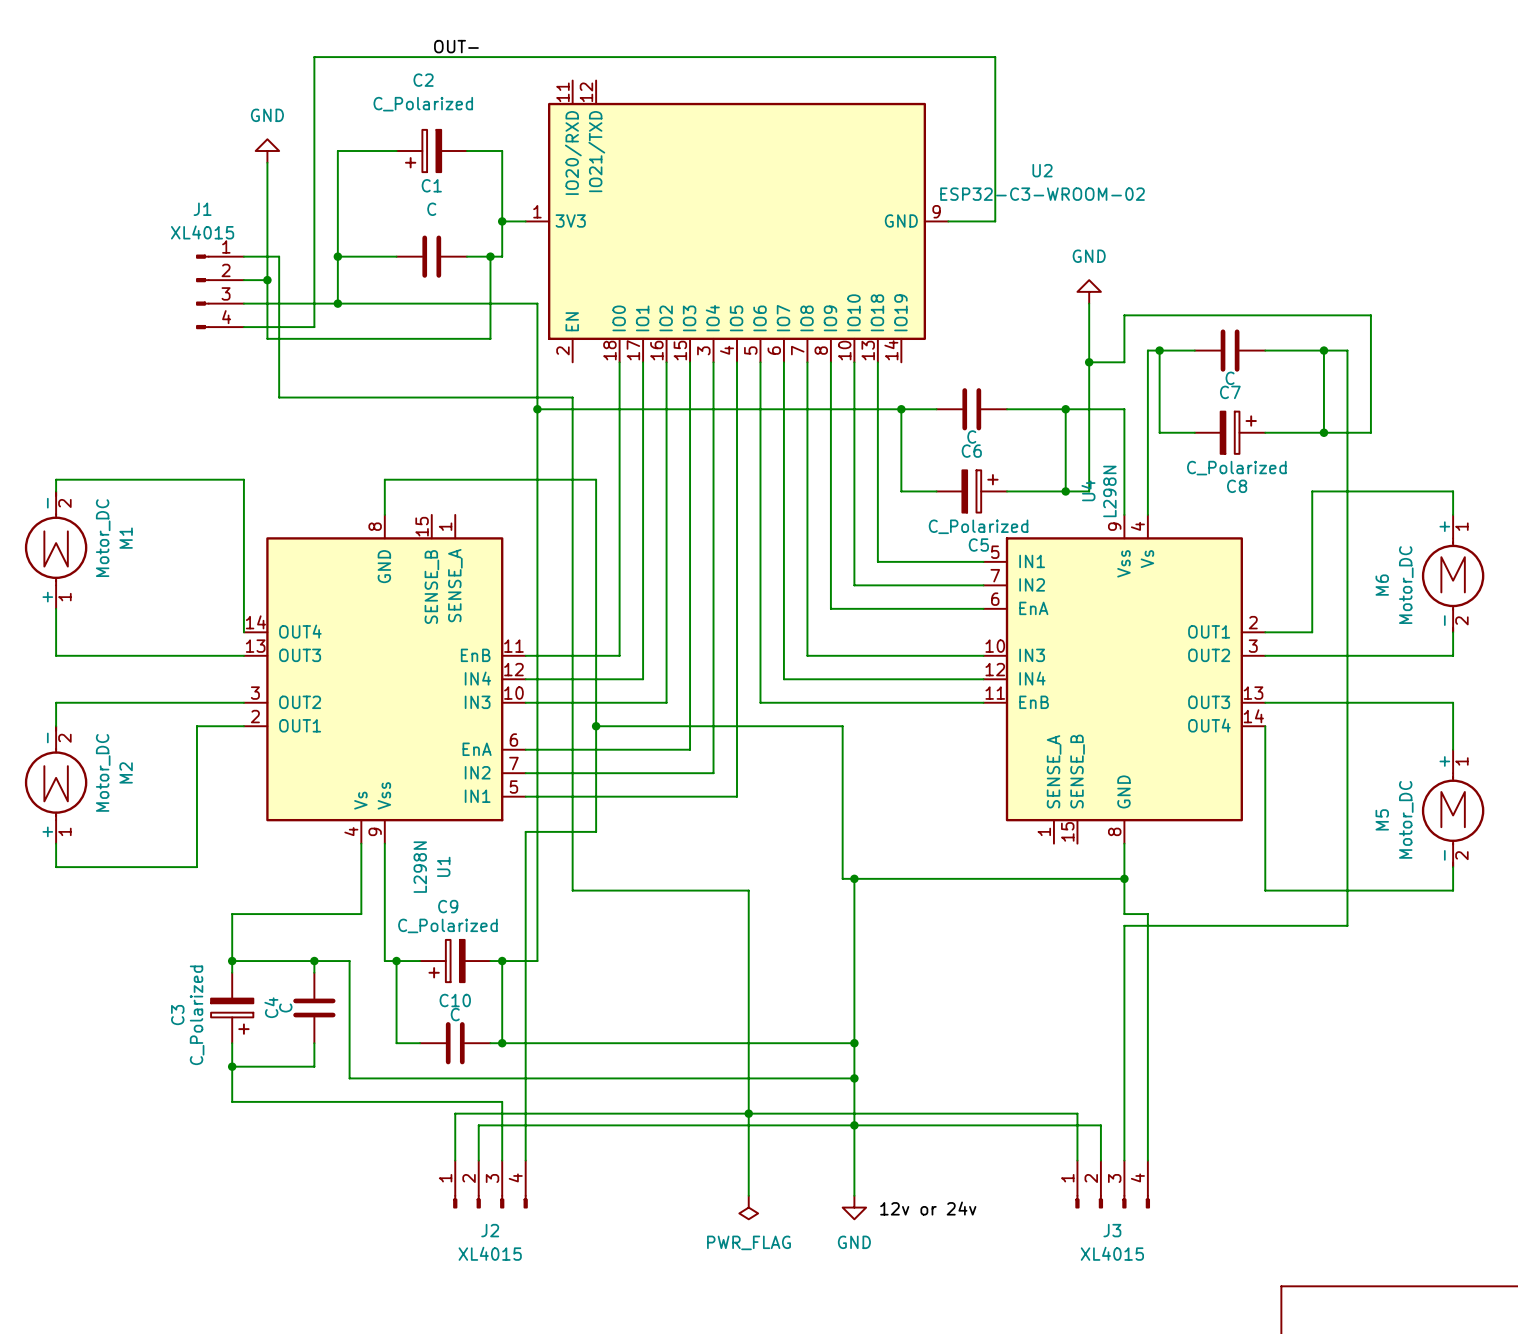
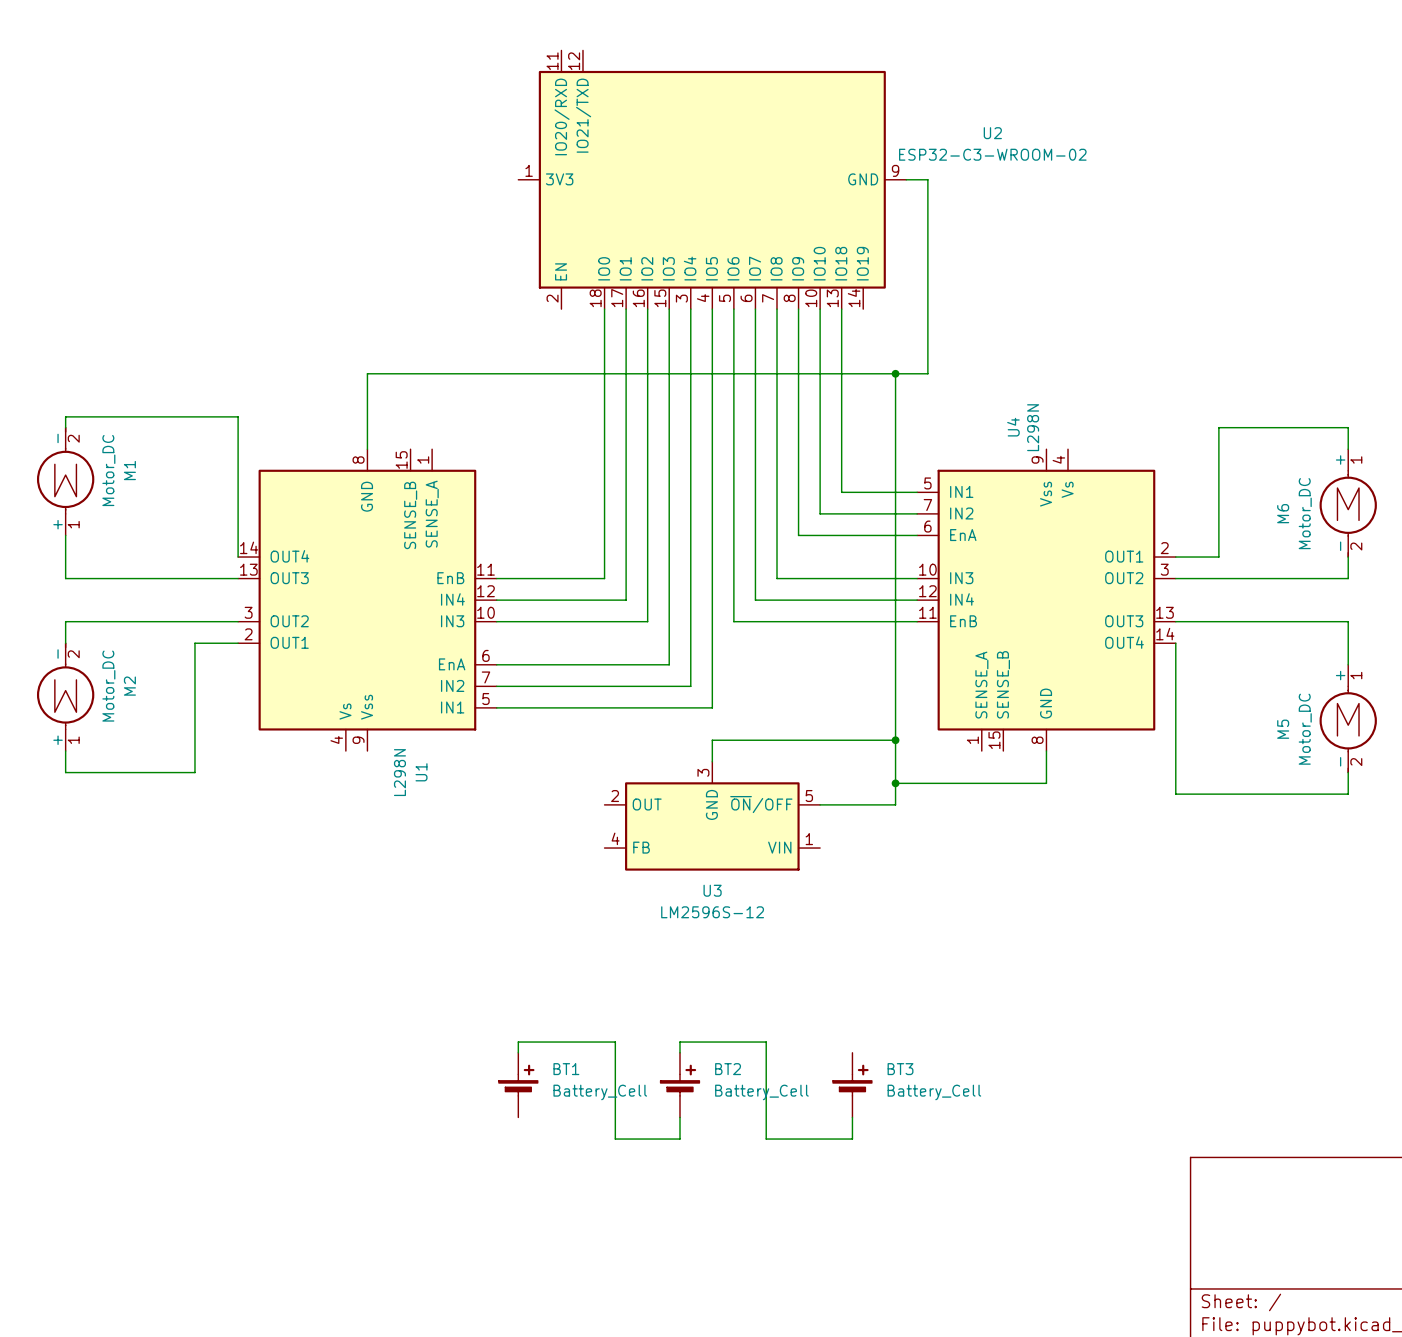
label: OUT- (456, 46) -> none
power symbol: GND (267, 151) -> none
wire: (396, 151) (337, 151) (337, 303) -> none
C2: C_Polarized (431, 151) -> none
wire: (466, 151) (502, 151) (502, 256) (466, 256) -> none
wire: (267, 162) (267, 338) (490, 338) (490, 256) -> none
wire: (502, 221) (525, 221) -> none
junction: (502, 221) -> none
U2 position: (737, 221) -> (712, 179)
wire: (995, 221) (995, 57) (314, 57) (314, 327) (243, 327) -> (927, 179) (927, 373) (367, 373) (367, 416)
wire: (243, 256) (279, 256) (279, 397) (572, 397) (572, 890) (748, 890) (748, 1195) -> none
wire: (337, 256) (396, 256) -> none
junction: (337, 256) -> none
C1: C (431, 256) -> none
junction: (490, 256) -> none
wire: (243, 280) (267, 280) -> none
junction: (267, 280) -> none
J1: XL4015 (220, 291) -> none
power symbol: GND (1089, 291) -> none
wire: (243, 303) (537, 303) (537, 961) (490, 961) -> none
junction: (337, 303) -> none
wire: (1089, 303) (1089, 491) (1007, 491) -> none
wire: (1159, 350) (1159, 432) (1194, 432) -> none
junction: (1159, 350) -> none
wire: (1194, 350) (1147, 350) (1147, 514) -> none
C7: C (1230, 350) -> none
wire: (1265, 350) (1347, 350) (1347, 925) (1124, 925) (1124, 1160) -> none
wire: (1323, 350) (1323, 432) -> none
junction: (1323, 350) -> none
wire: (619, 362) (619, 655) -> (604, 578) (582, 578)
wire: none -> (841, 309) (841, 352)
wire: (1089, 362) (1124, 362) (1124, 315) (1370, 315) (1370, 432) (1265, 432) -> none
junction: (1089, 362) -> none
wire: (537, 409) (936, 409) -> none
junction: (537, 409) -> none
junction: (901, 409) -> none
C6: C (971, 409) -> none
wire: (1007, 409) (1124, 409) (1124, 514) -> none
wire: (1065, 409) (1065, 491) -> none
junction: (1065, 409) -> none
wire: none -> (895, 373) (895, 804) (820, 804)
junction: none -> (895, 373)
C8: C_Polarized (1230, 432) -> none
junction: (1323, 432) -> none
wire: (384, 479) (596, 479) (596, 831) (525, 831) (525, 1160) -> none
wire: (901, 491) (936, 491) -> (841, 427) (841, 492)
C5: C_Polarized (971, 491) -> none
junction: (1065, 491) -> none
wire: (877, 561) (901, 561) -> (820, 492) (820, 513)
wire: (854, 585) (877, 585) -> (798, 513) (798, 535)
wire: (830, 608) (854, 608) -> (777, 535) (777, 578)
wire: (643, 655) (643, 679) -> (626, 600) (604, 600)
wire: (807, 655) (830, 655) -> (755, 578) (755, 600)
wire: (666, 679) (666, 702) -> (647, 621) (626, 621)
wire: (783, 679) (807, 679) -> none
wire: (690, 702) (690, 749) -> none
wire: (760, 702) (783, 702) -> (733, 600) (733, 621)
wire: none -> (712, 621) (712, 707) (690, 707)
wire: (596, 726) (842, 726) (842, 878) (960, 878) -> none
junction: (596, 726) -> none
wire: (713, 749) (713, 773) -> (669, 664) (647, 664)
wire: (737, 773) (737, 796) -> (690, 686) (669, 686)
wire: none -> (895, 740) (712, 740) (712, 761)
junction: none -> (895, 740)
wire: (361, 843) (361, 914) (232, 914) (232, 972) -> none
wire: (384, 843) (384, 961) (420, 961) -> none
wire: (854, 878) (854, 1195) -> none
junction: (854, 878) -> none
junction: none -> (895, 783)
wire: (1124, 878) (1124, 914) (1147, 914) (1147, 1160) -> none
junction: (1124, 878) -> none
U3: none -> LM2596S-12 (712, 816)
wire: (232, 961) (349, 961) (349, 1078) (854, 1078) -> none
junction: (232, 961) -> none
wire: (314, 961) (314, 972) -> none
junction: (314, 961) -> none
wire: (396, 961) (396, 1043) (420, 1043) -> none
junction: (396, 961) -> none
C9: C_Polarized (455, 961) -> none
wire: (502, 961) (502, 1043) -> none
junction: (502, 961) -> none
C3: C_Polarized (232, 1007) -> none
C4: C (314, 1007) -> none
wire: (232, 1043) (232, 1101) (502, 1101) (502, 1160) -> none
wire: (314, 1043) (314, 1066) (232, 1066) -> none
C10: C (455, 1043) -> none
wire: (490, 1043) (854, 1043) -> none
junction: (502, 1043) -> none
junction: (854, 1043) -> none
junction: (232, 1066) -> none
junction: (854, 1078) -> none
junction: (748, 1113) -> none
junction: (854, 1125) -> none
wire: (455, 1160) (455, 1113) (1077, 1113) (1077, 1160) -> none
wire: (478, 1160) (478, 1125) (1100, 1125) (1100, 1160) -> none
wire: none -> (518, 1052) (518, 1042) (615, 1042) (615, 1139) (679, 1139) (679, 1117)
wire: none -> (679, 1052) (679, 1042) (766, 1042) (766, 1139) (852, 1139) (852, 1117)
J2: XL4015 (490, 1184) -> none
J3: XL4015 (1112, 1184) -> none
BT1: none -> Battery_Cell (518, 1085)
BT2: none -> Battery_Cell (679, 1085)
power symbol: PWR_FLAG (748, 1207) -> none
power symbol: GND (854, 1207) -> none
BT3: none -> Battery_Cell (852, 1085)
label: 12v or 24v (928, 1208) -> none

